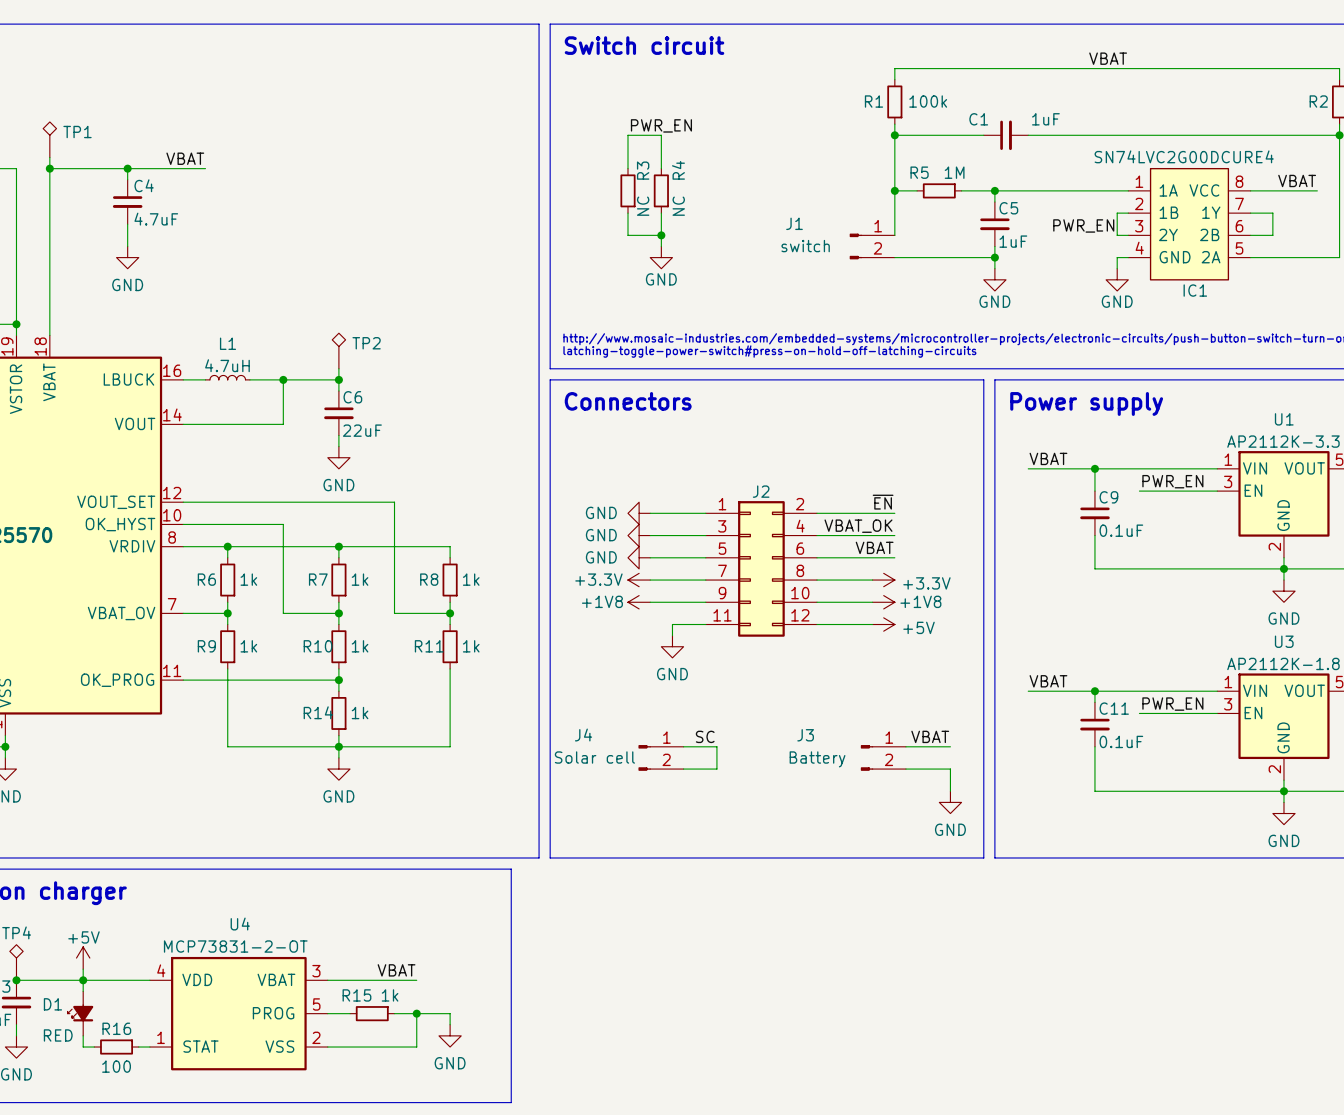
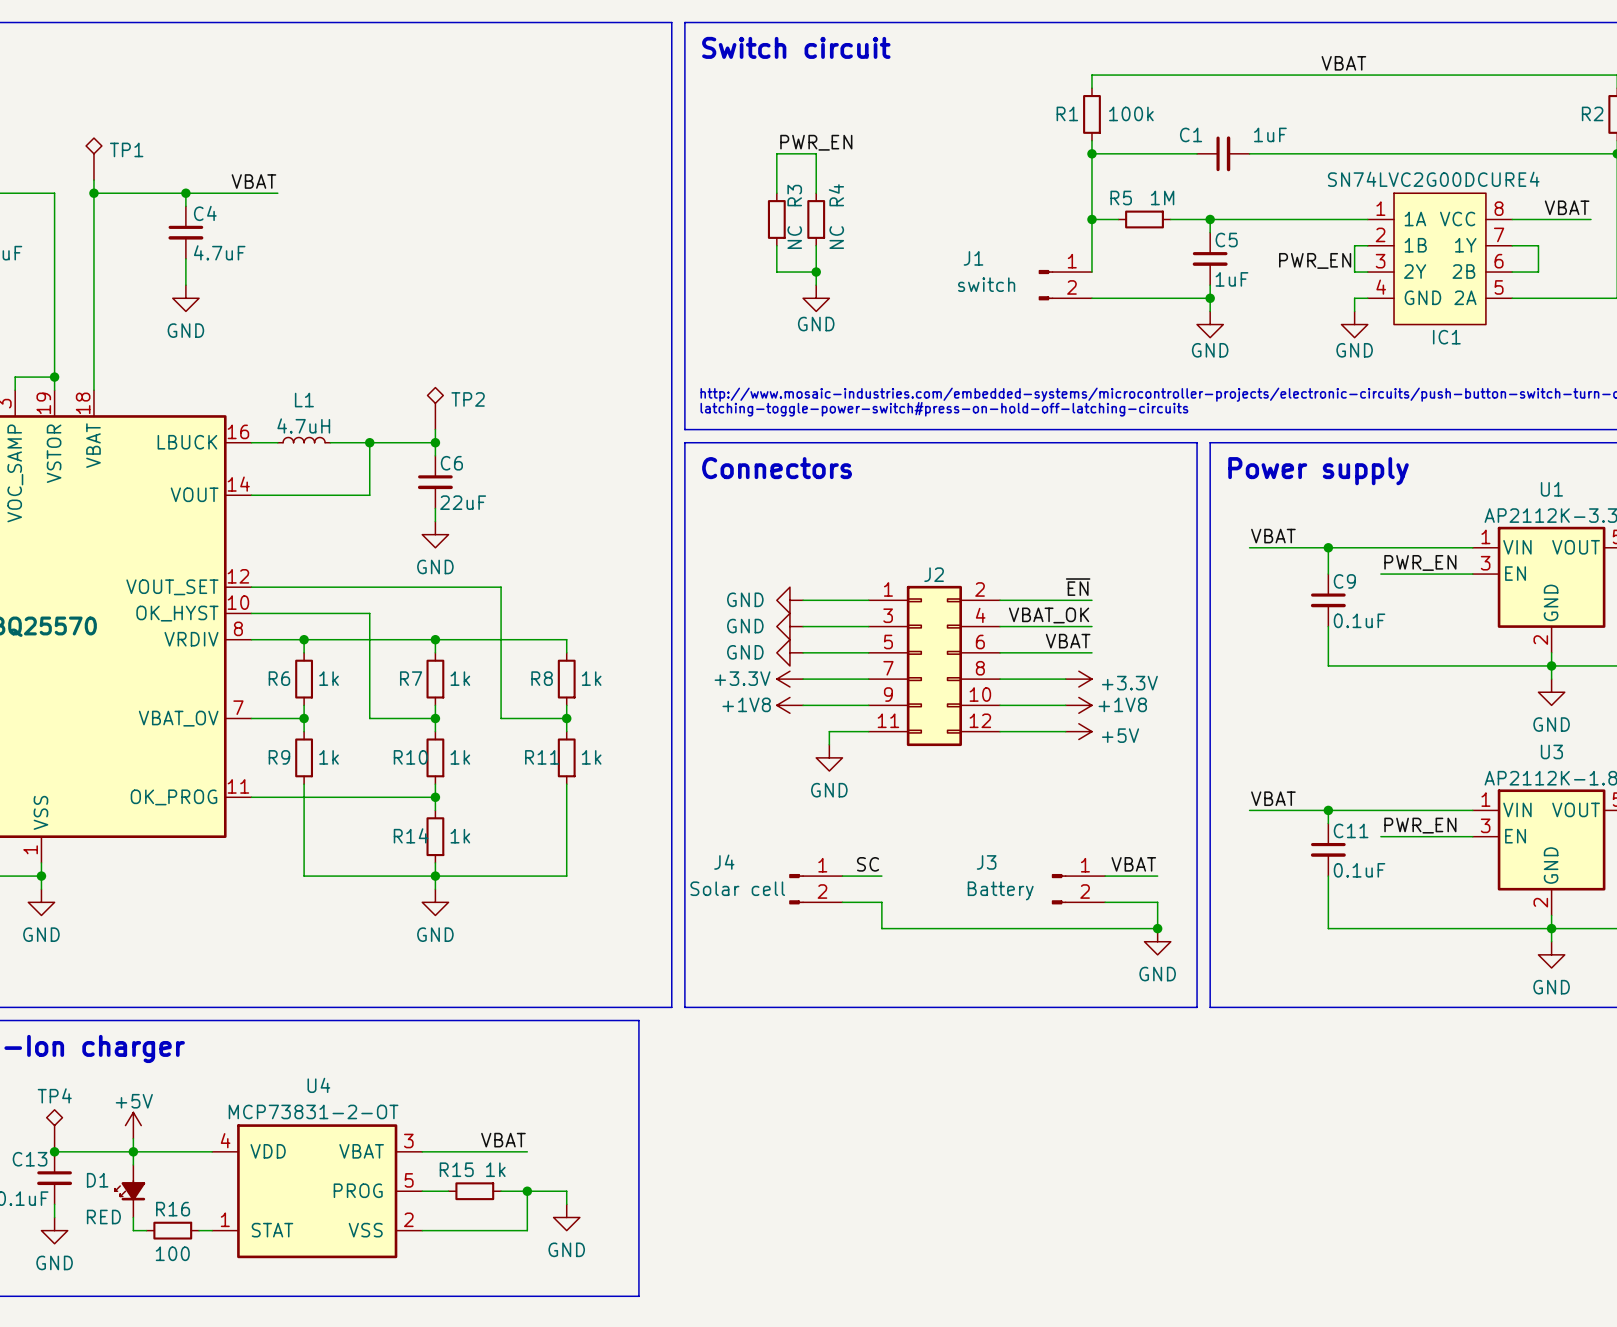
wire: (716, 746) (716, 769) -> (1157, 928) (881, 928) (881, 902)
junction: none -> (1157, 928)

